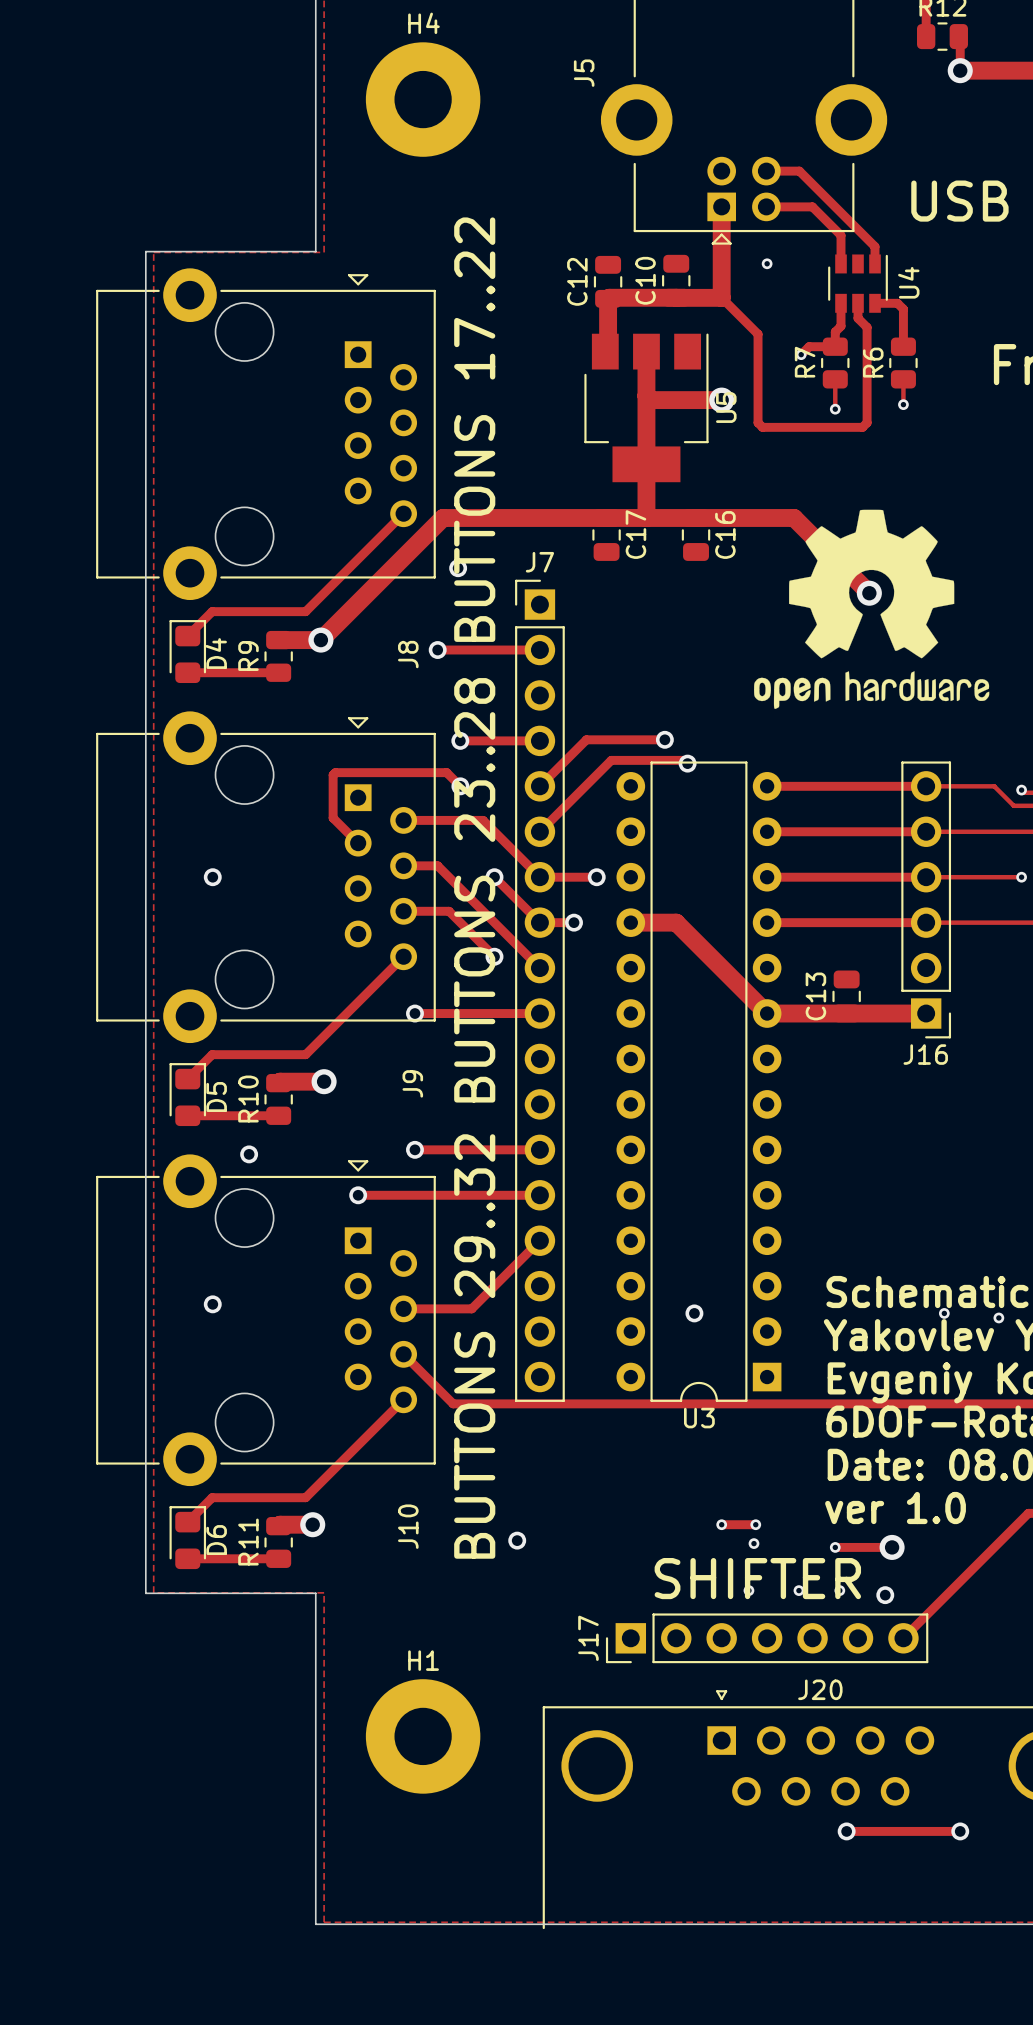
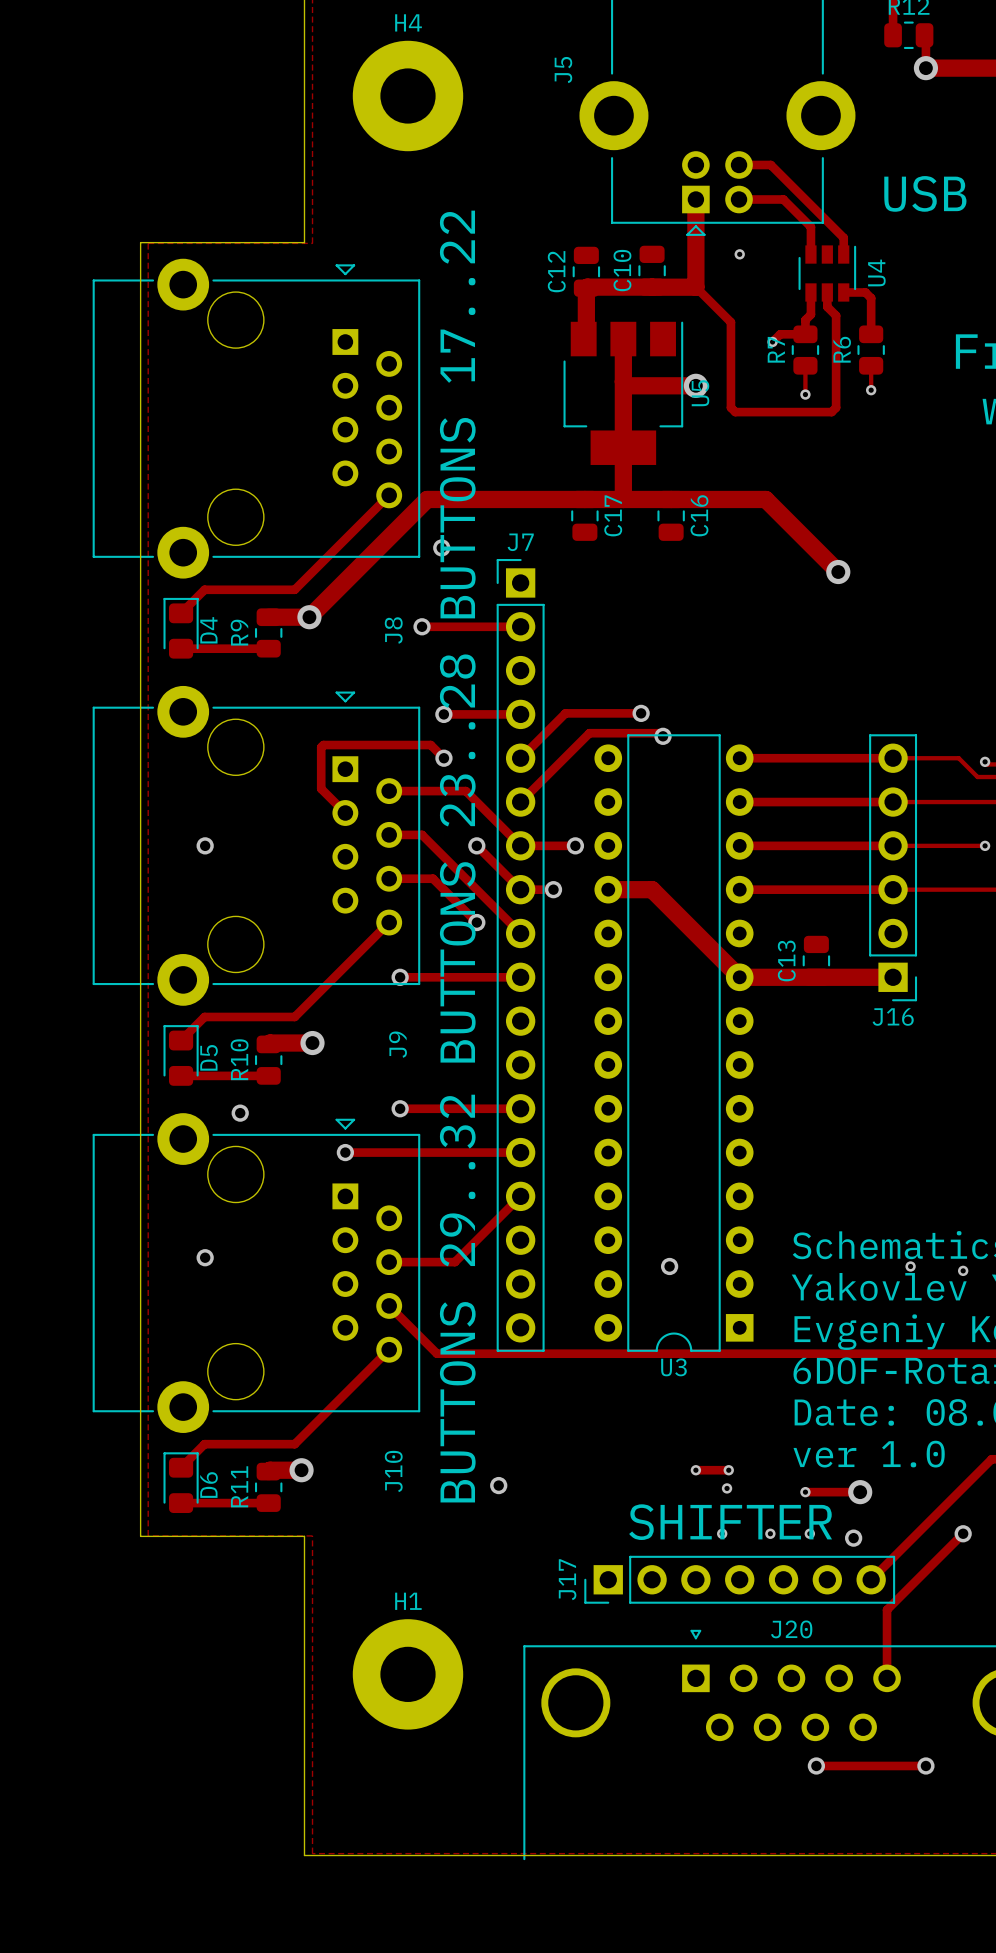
drawing: [754, 509, 990, 709] -> none
track: none -> (963, 1533) (887, 1609) (887, 1678)
via: none -> (963, 1533)

